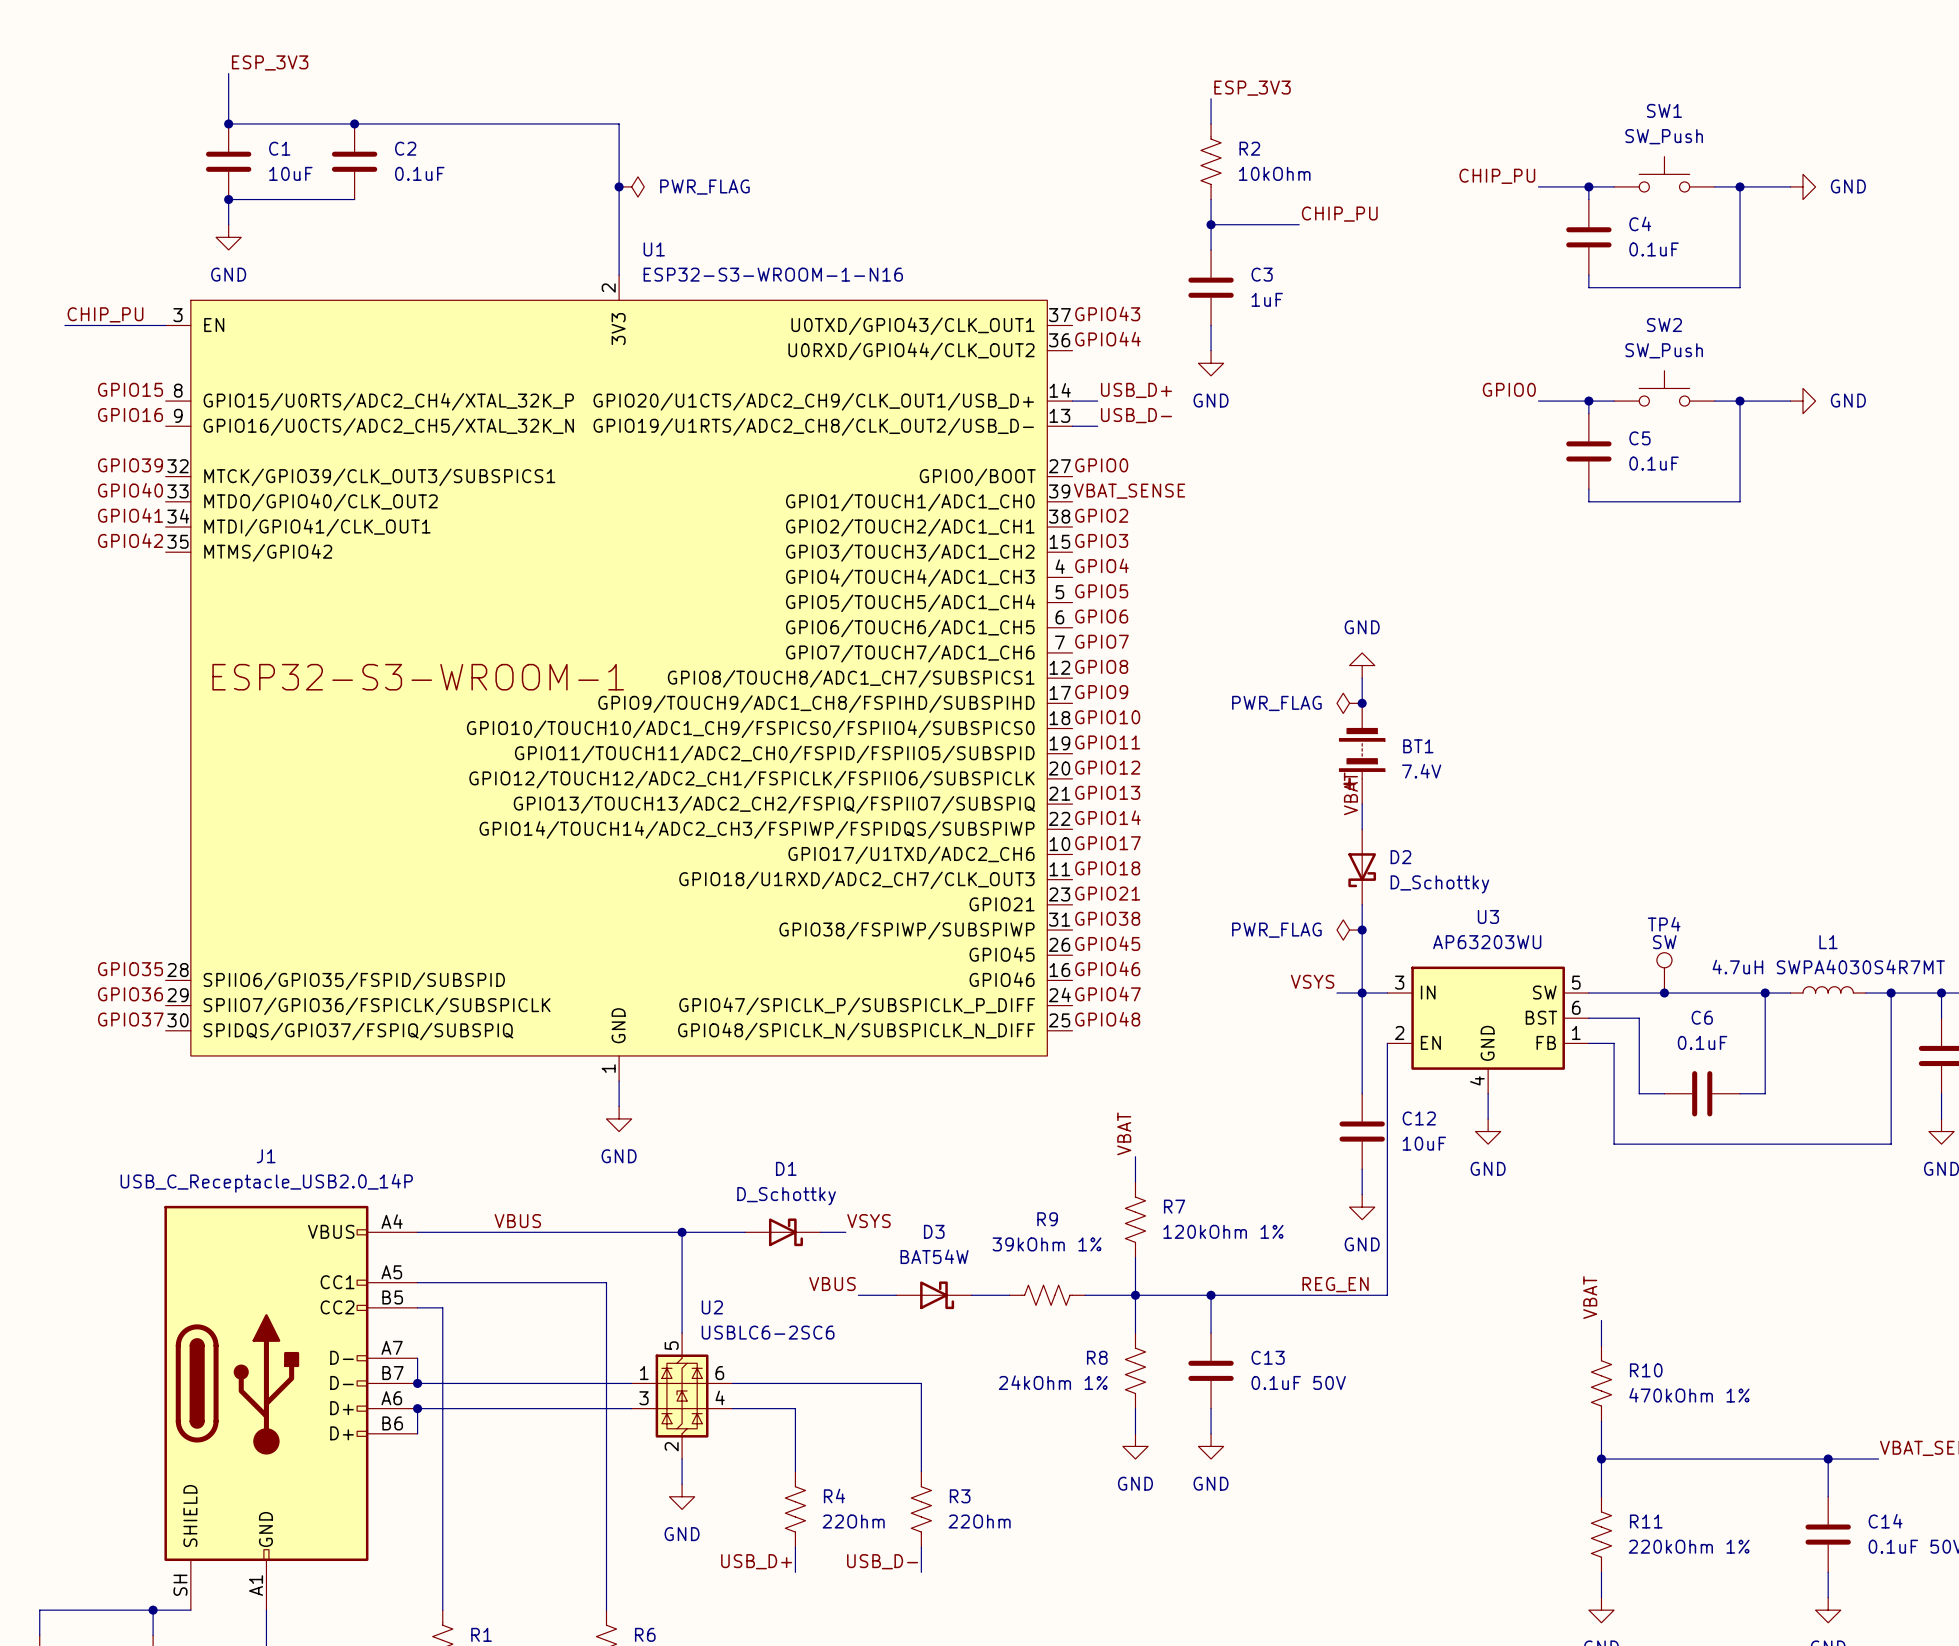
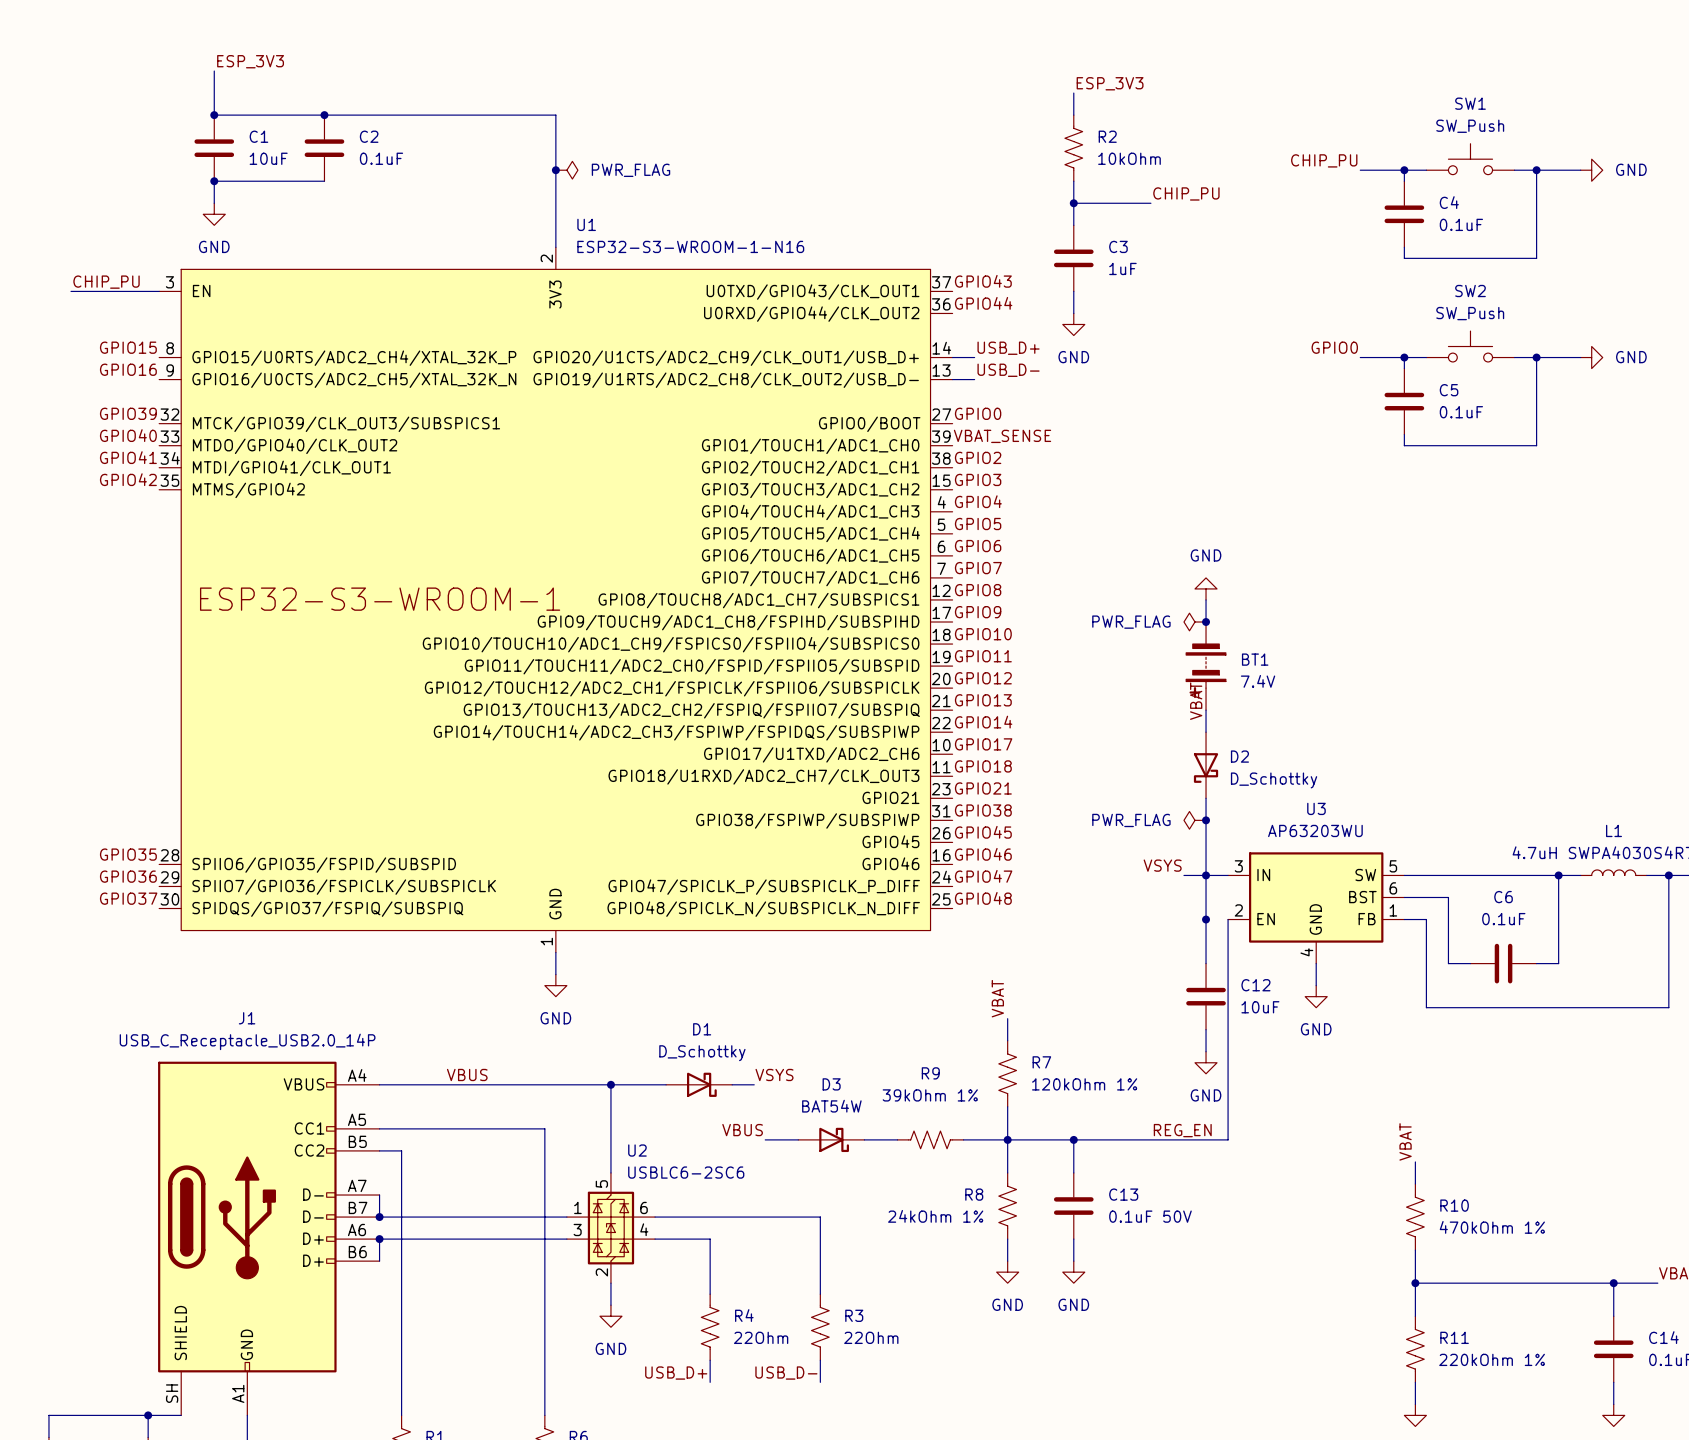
TP4: SW (1664, 972) -> none
junction: (1664, 993) -> none
junction: none -> (1206, 919)

